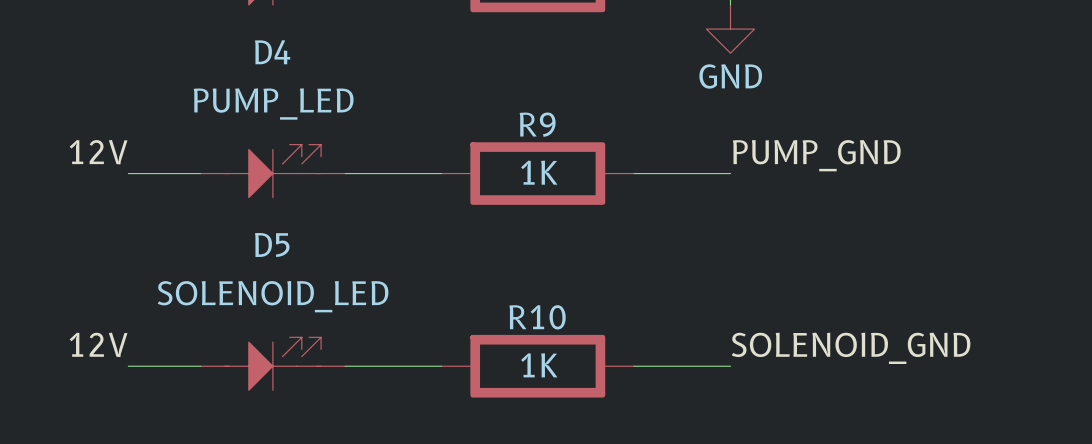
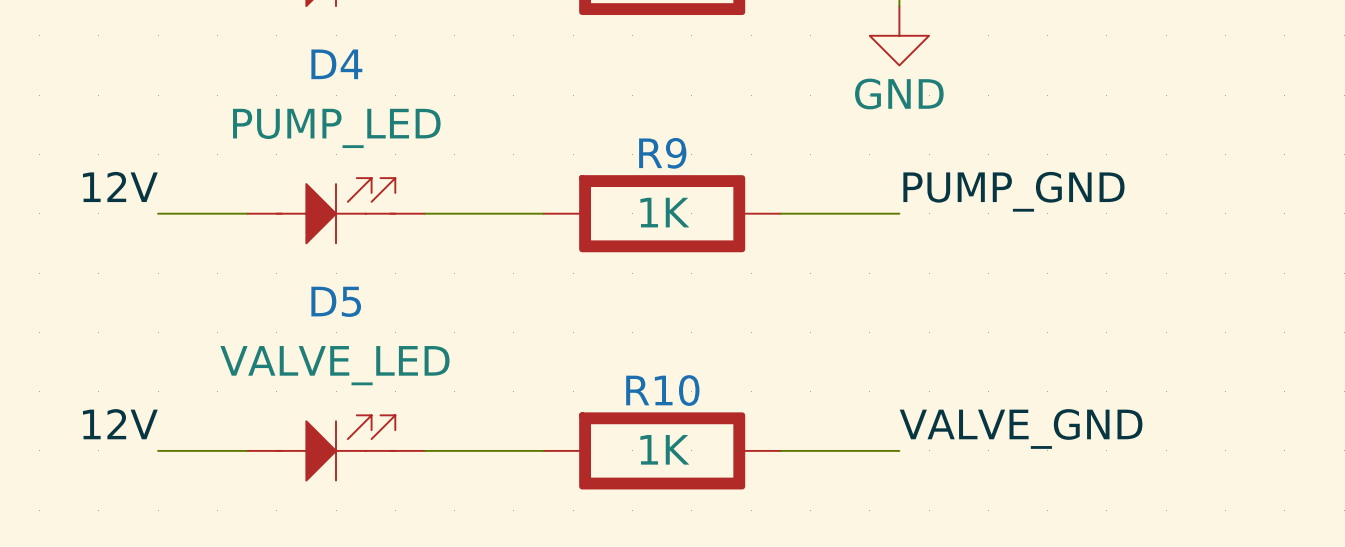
D5 value: SOLENOID_LED (273, 296) -> VALVE_LED (334, 365)
label: SOLENOID_GND (851, 348) -> VALVE_GND (1021, 428)

